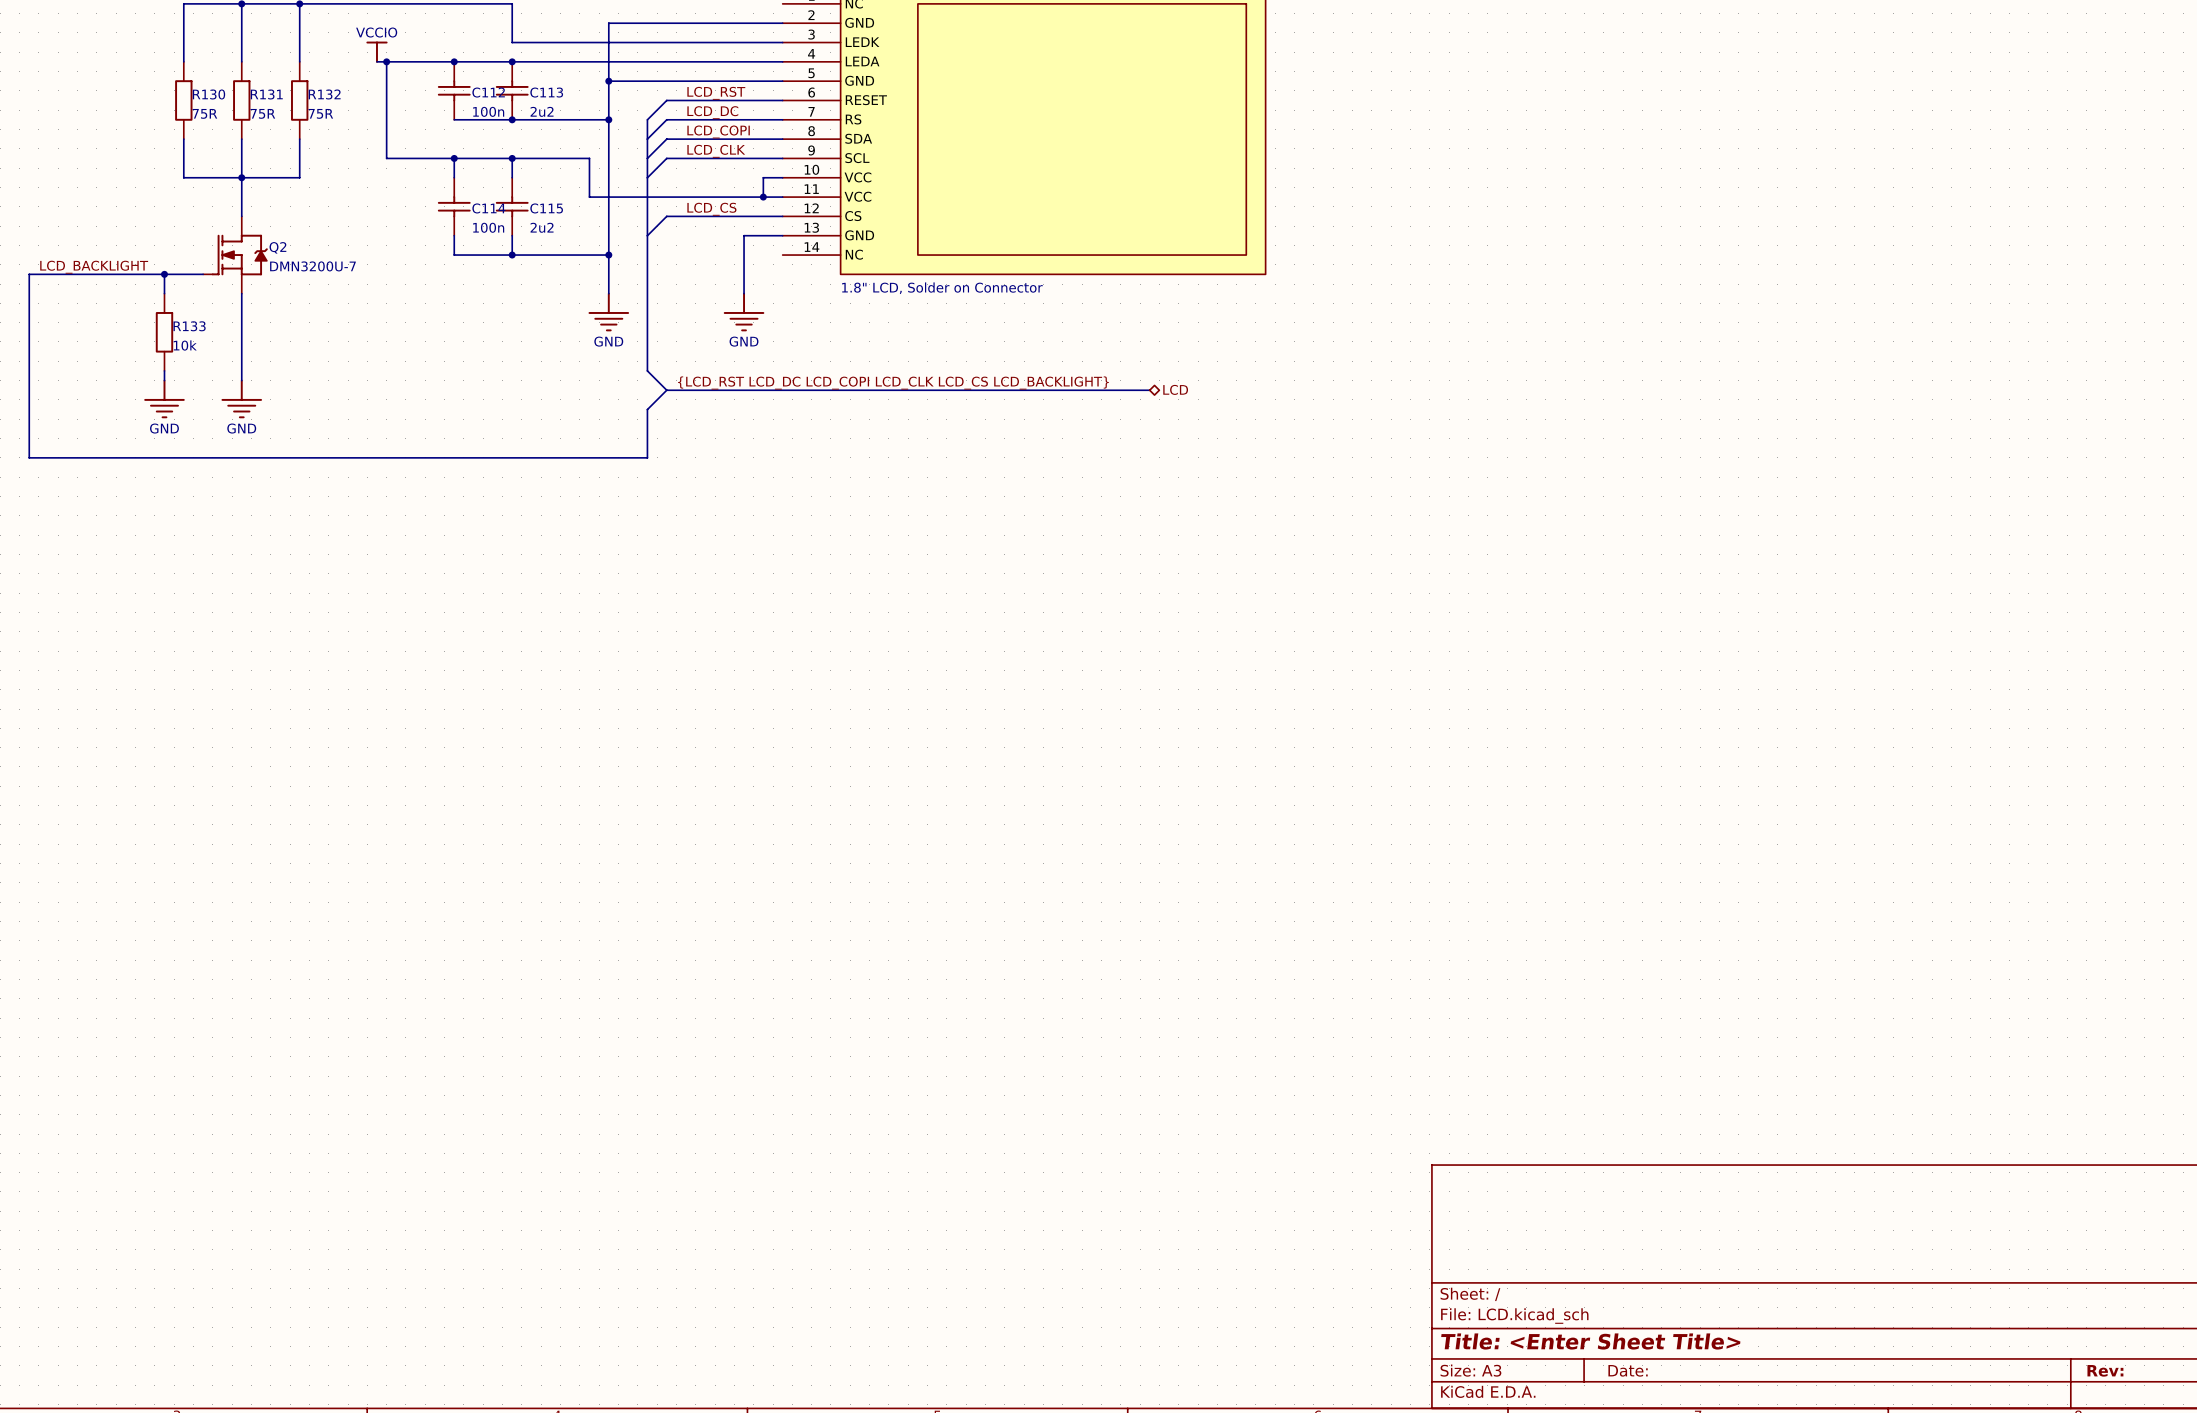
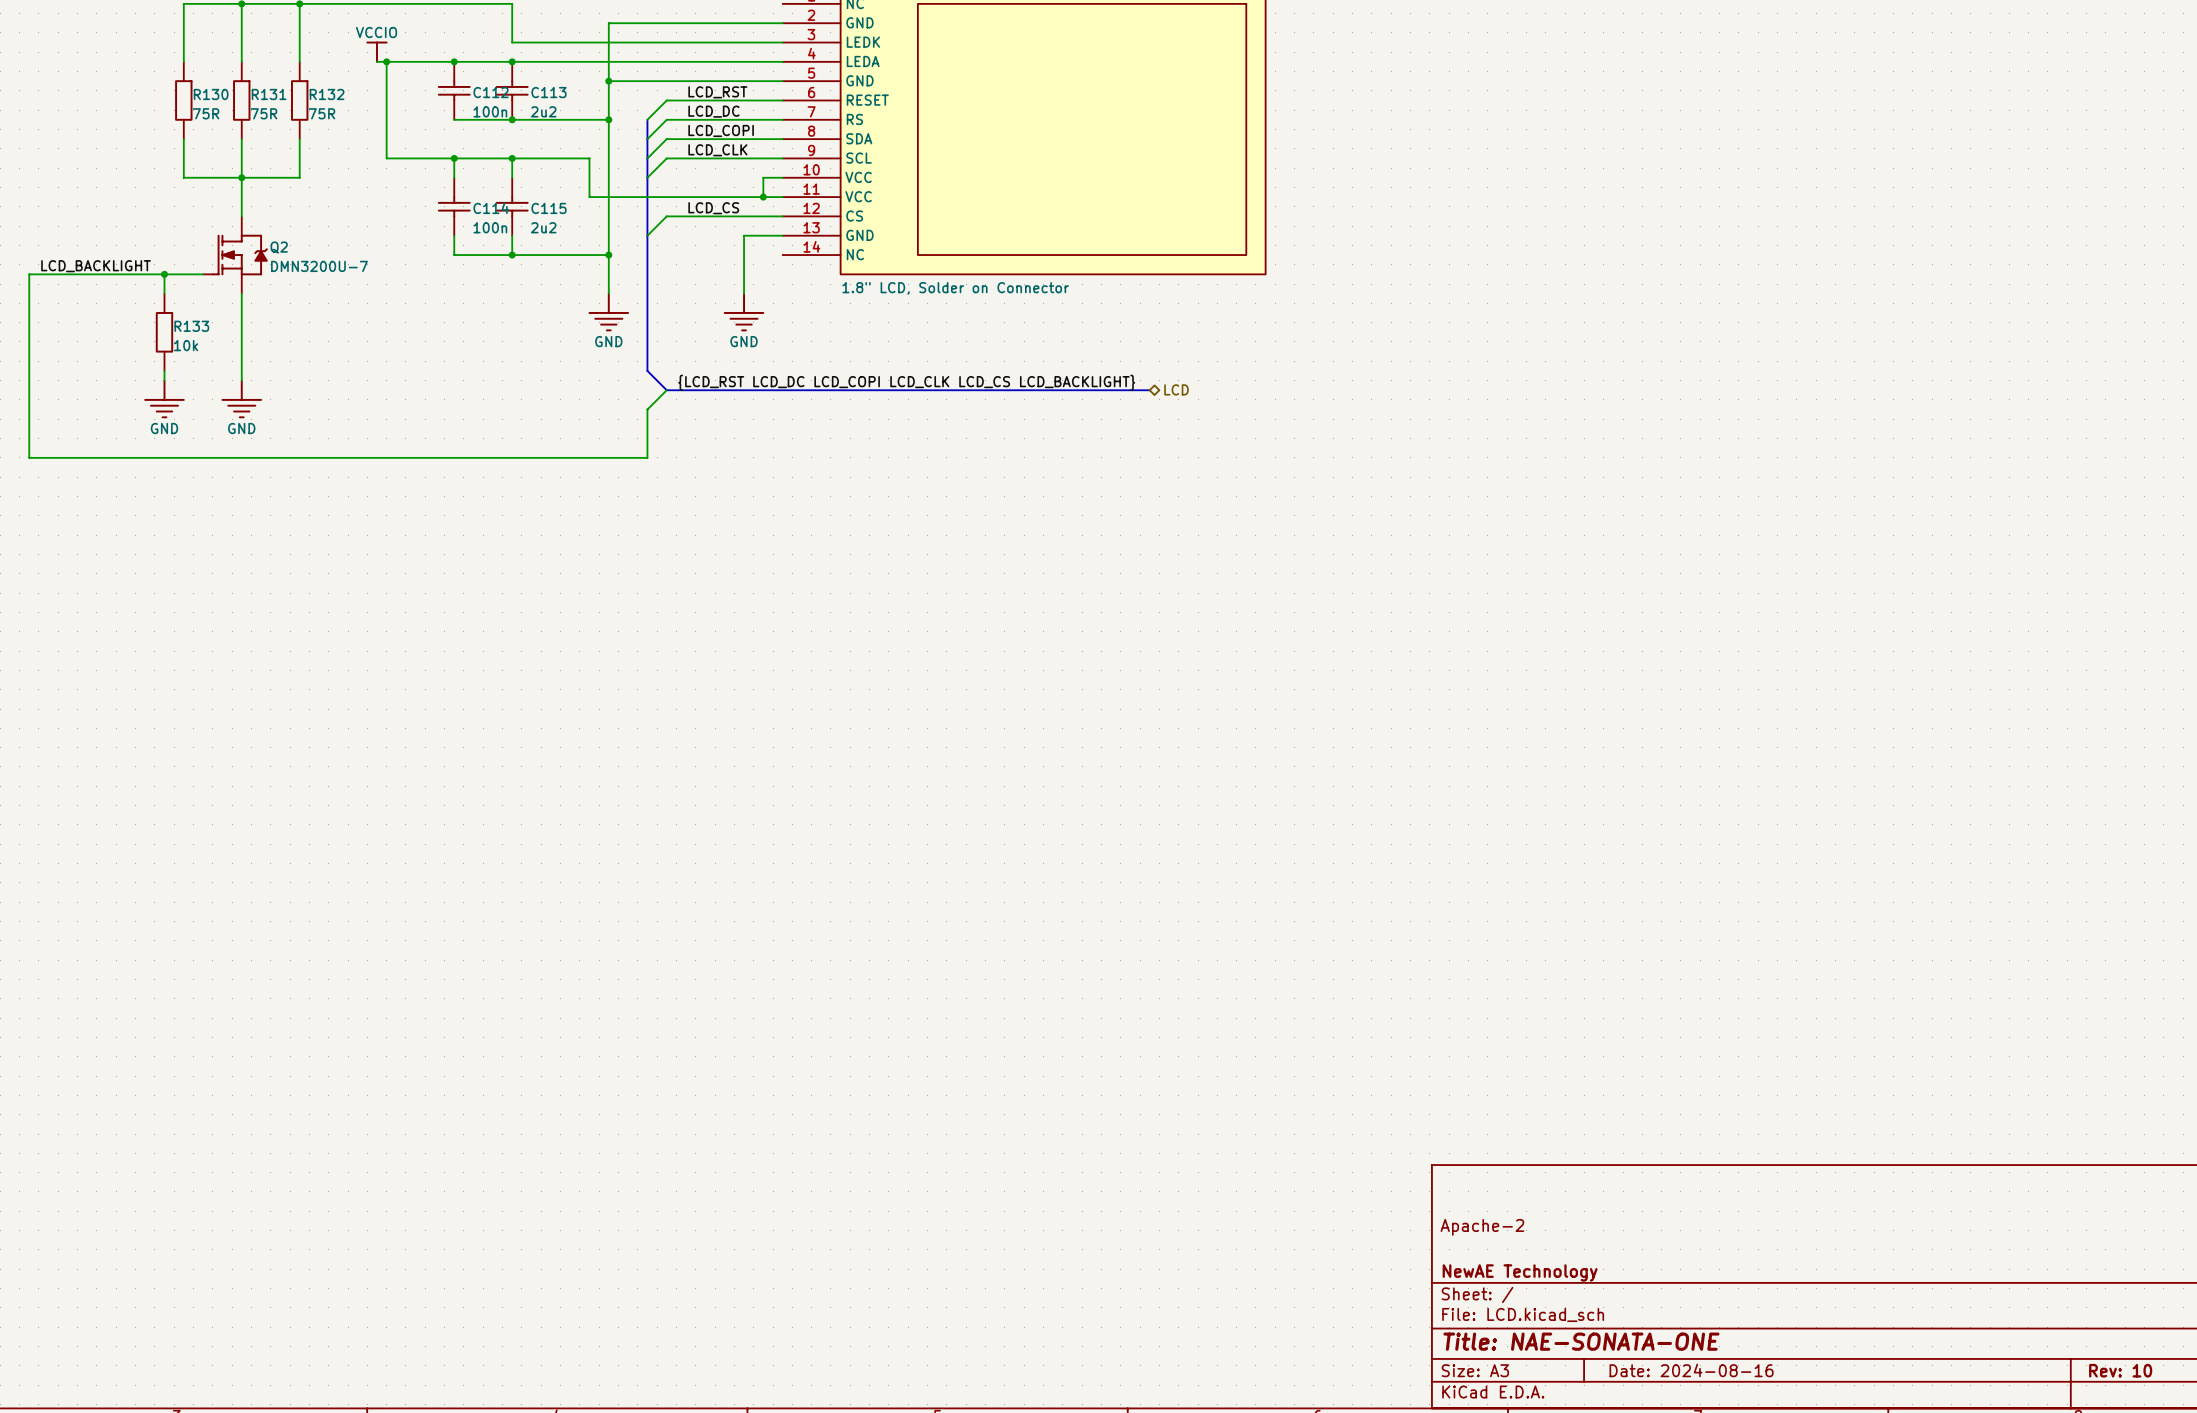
title block: none -> Apache-2 (1482, 1227)
title block: none -> NewAE Technology (1520, 1272)
title block: Title: <Enter Sheet Title> (1590, 1341) -> Title: NAE-SONATA-ONE (1581, 1341)
title block: Date: (1628, 1370) -> Date: 2024-08-16 (1691, 1370)
title block: Rev: (2105, 1370) -> Rev: 10 (2120, 1370)

